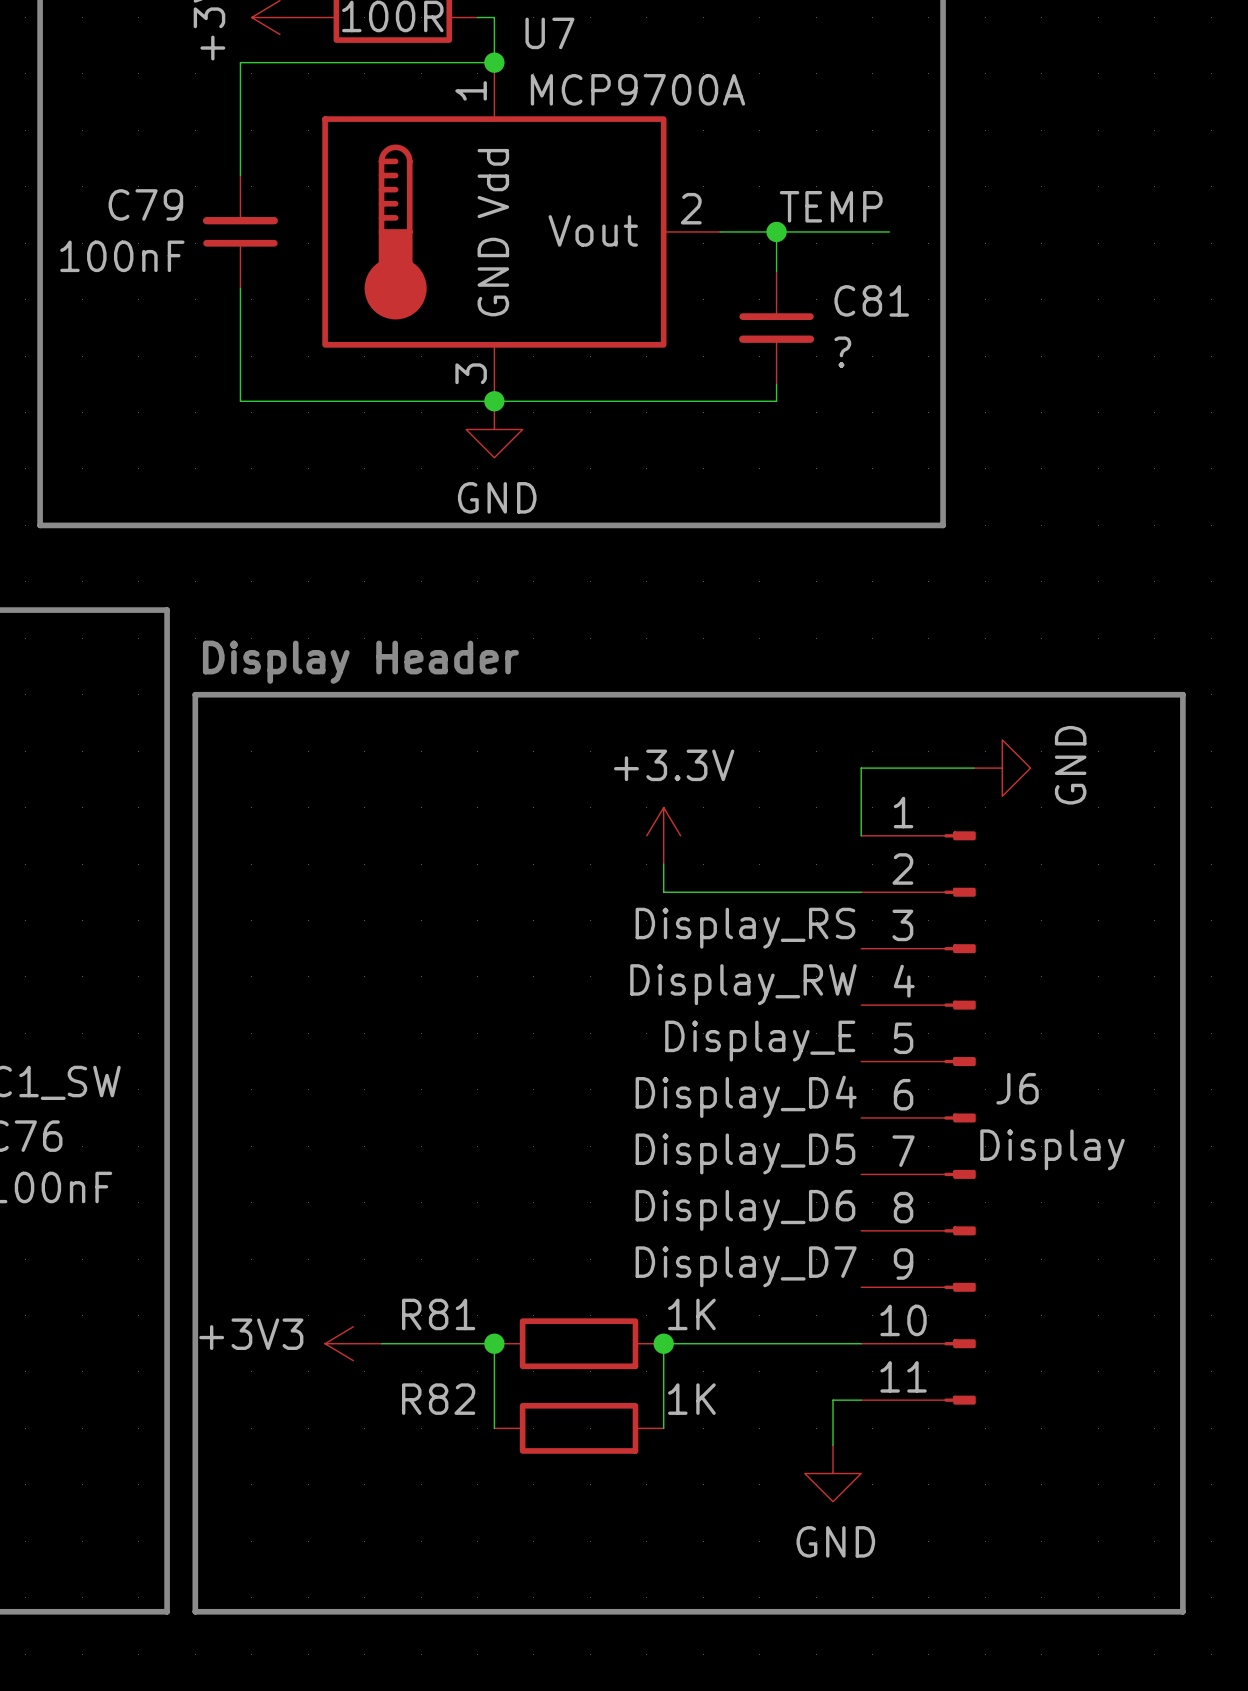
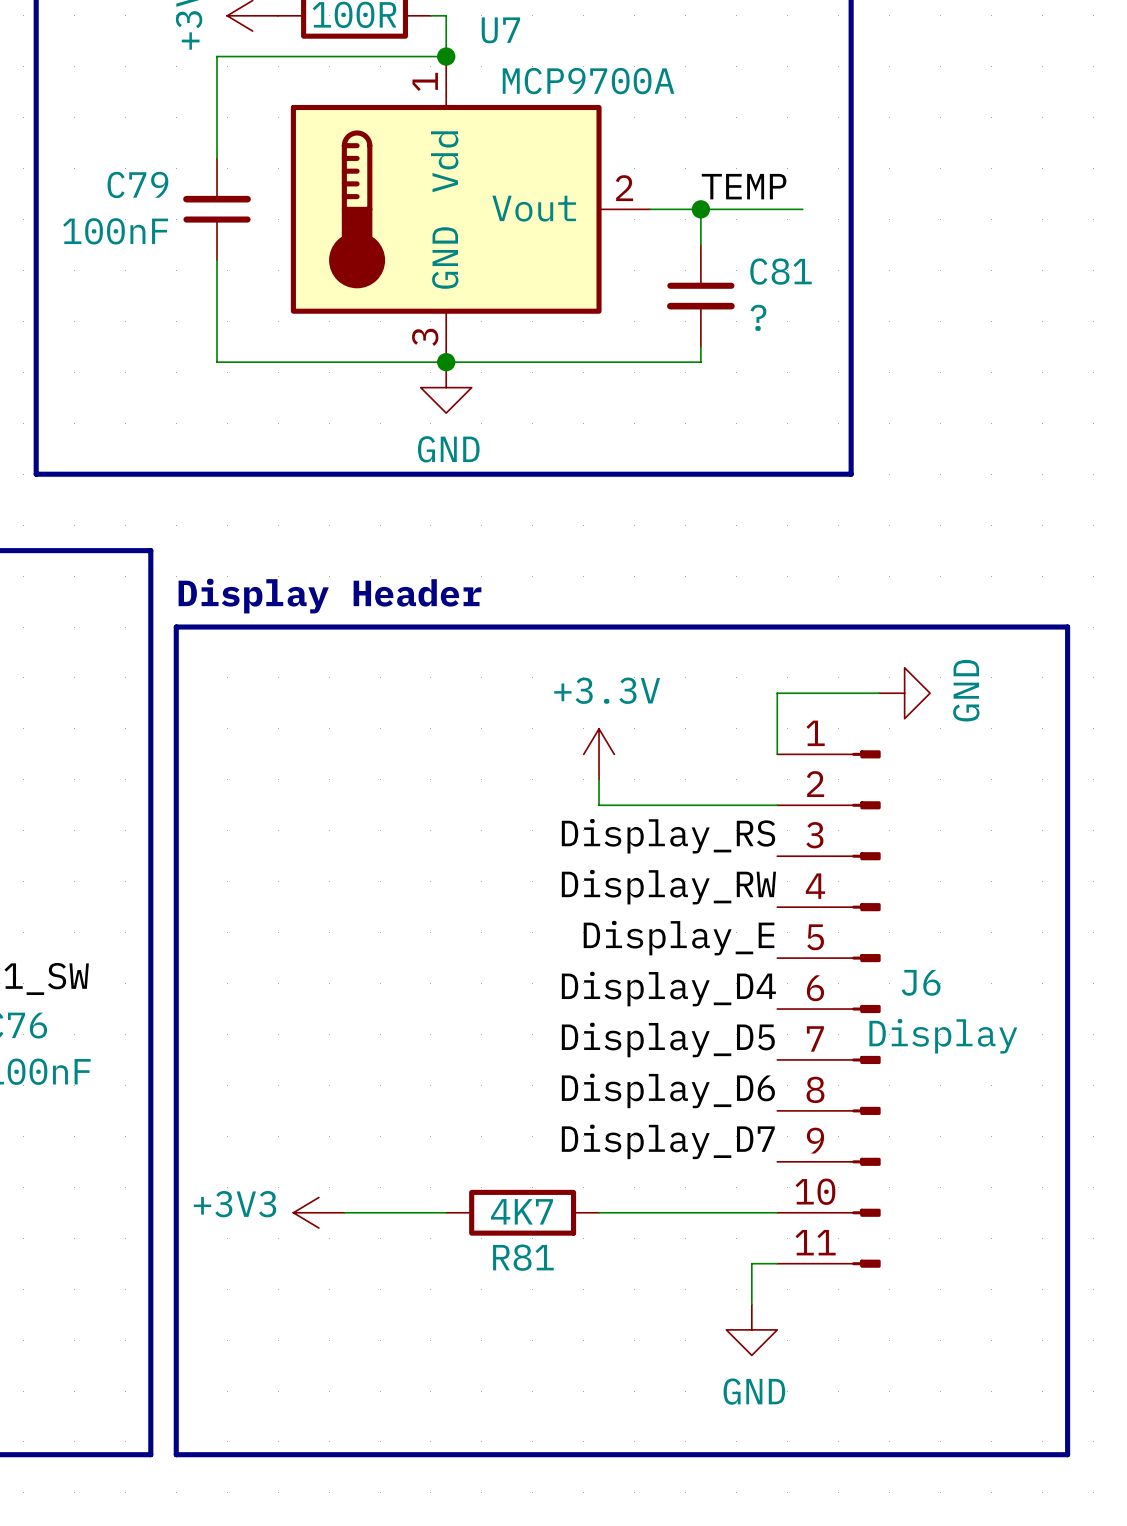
R81 name position: R81 (438, 1314) -> R81 (523, 1257)
R81 value: 1K (691, 1314) -> 4K7 (521, 1211)
wire: (494, 1343) (494, 1428) -> none
junction: (494, 1343) -> none
wire: (663, 1343) (663, 1428) -> none
junction: (663, 1343) -> none
R82: 1K (579, 1428) -> none

